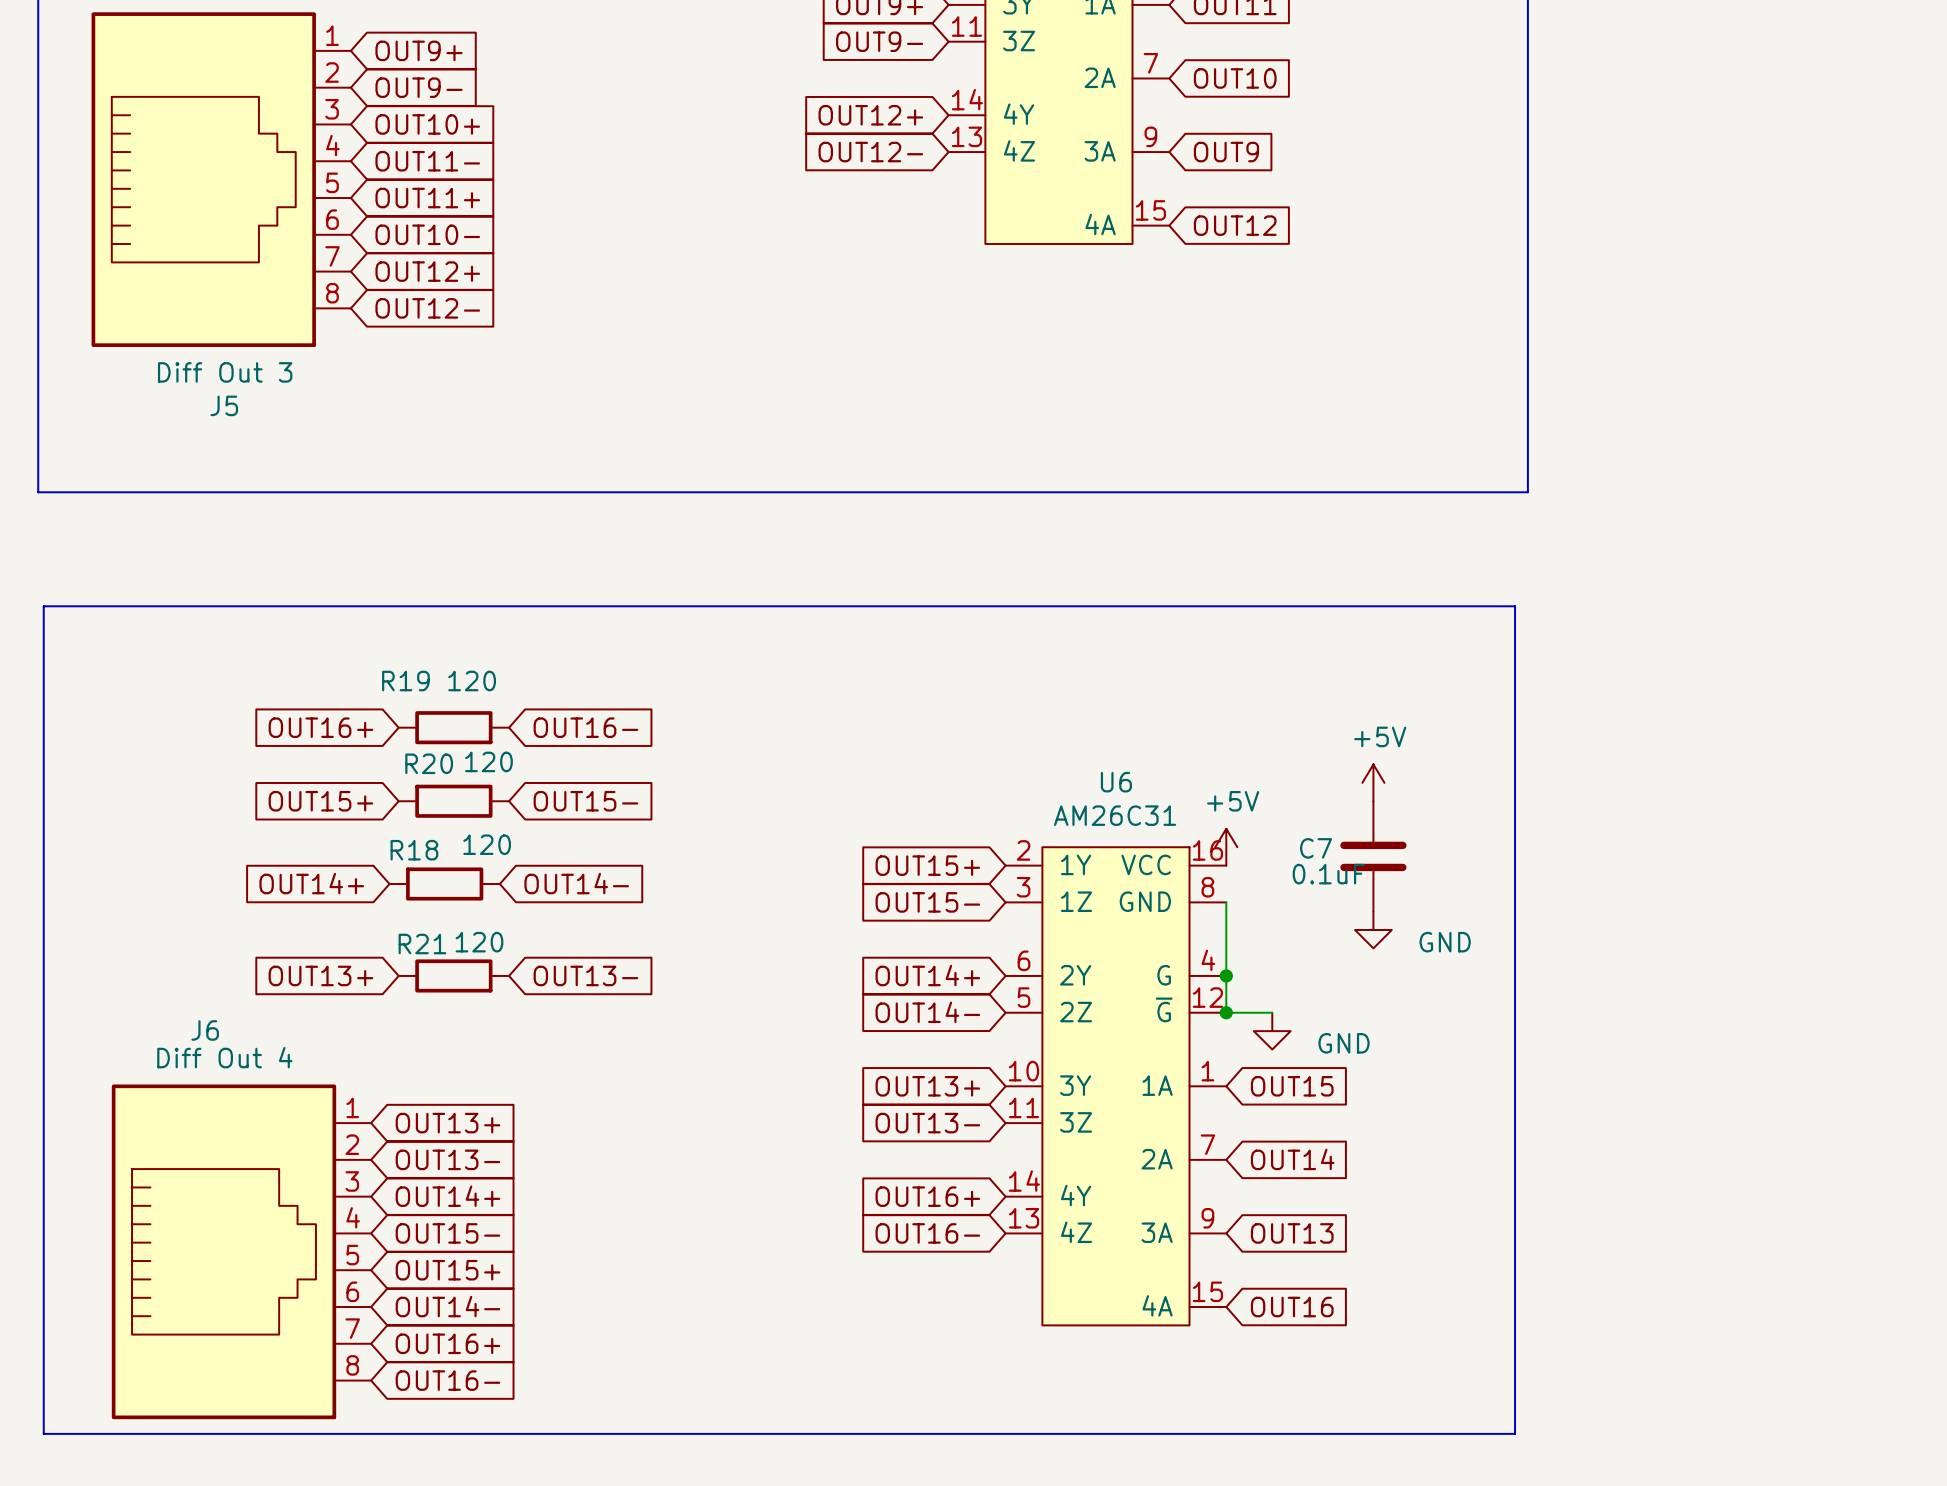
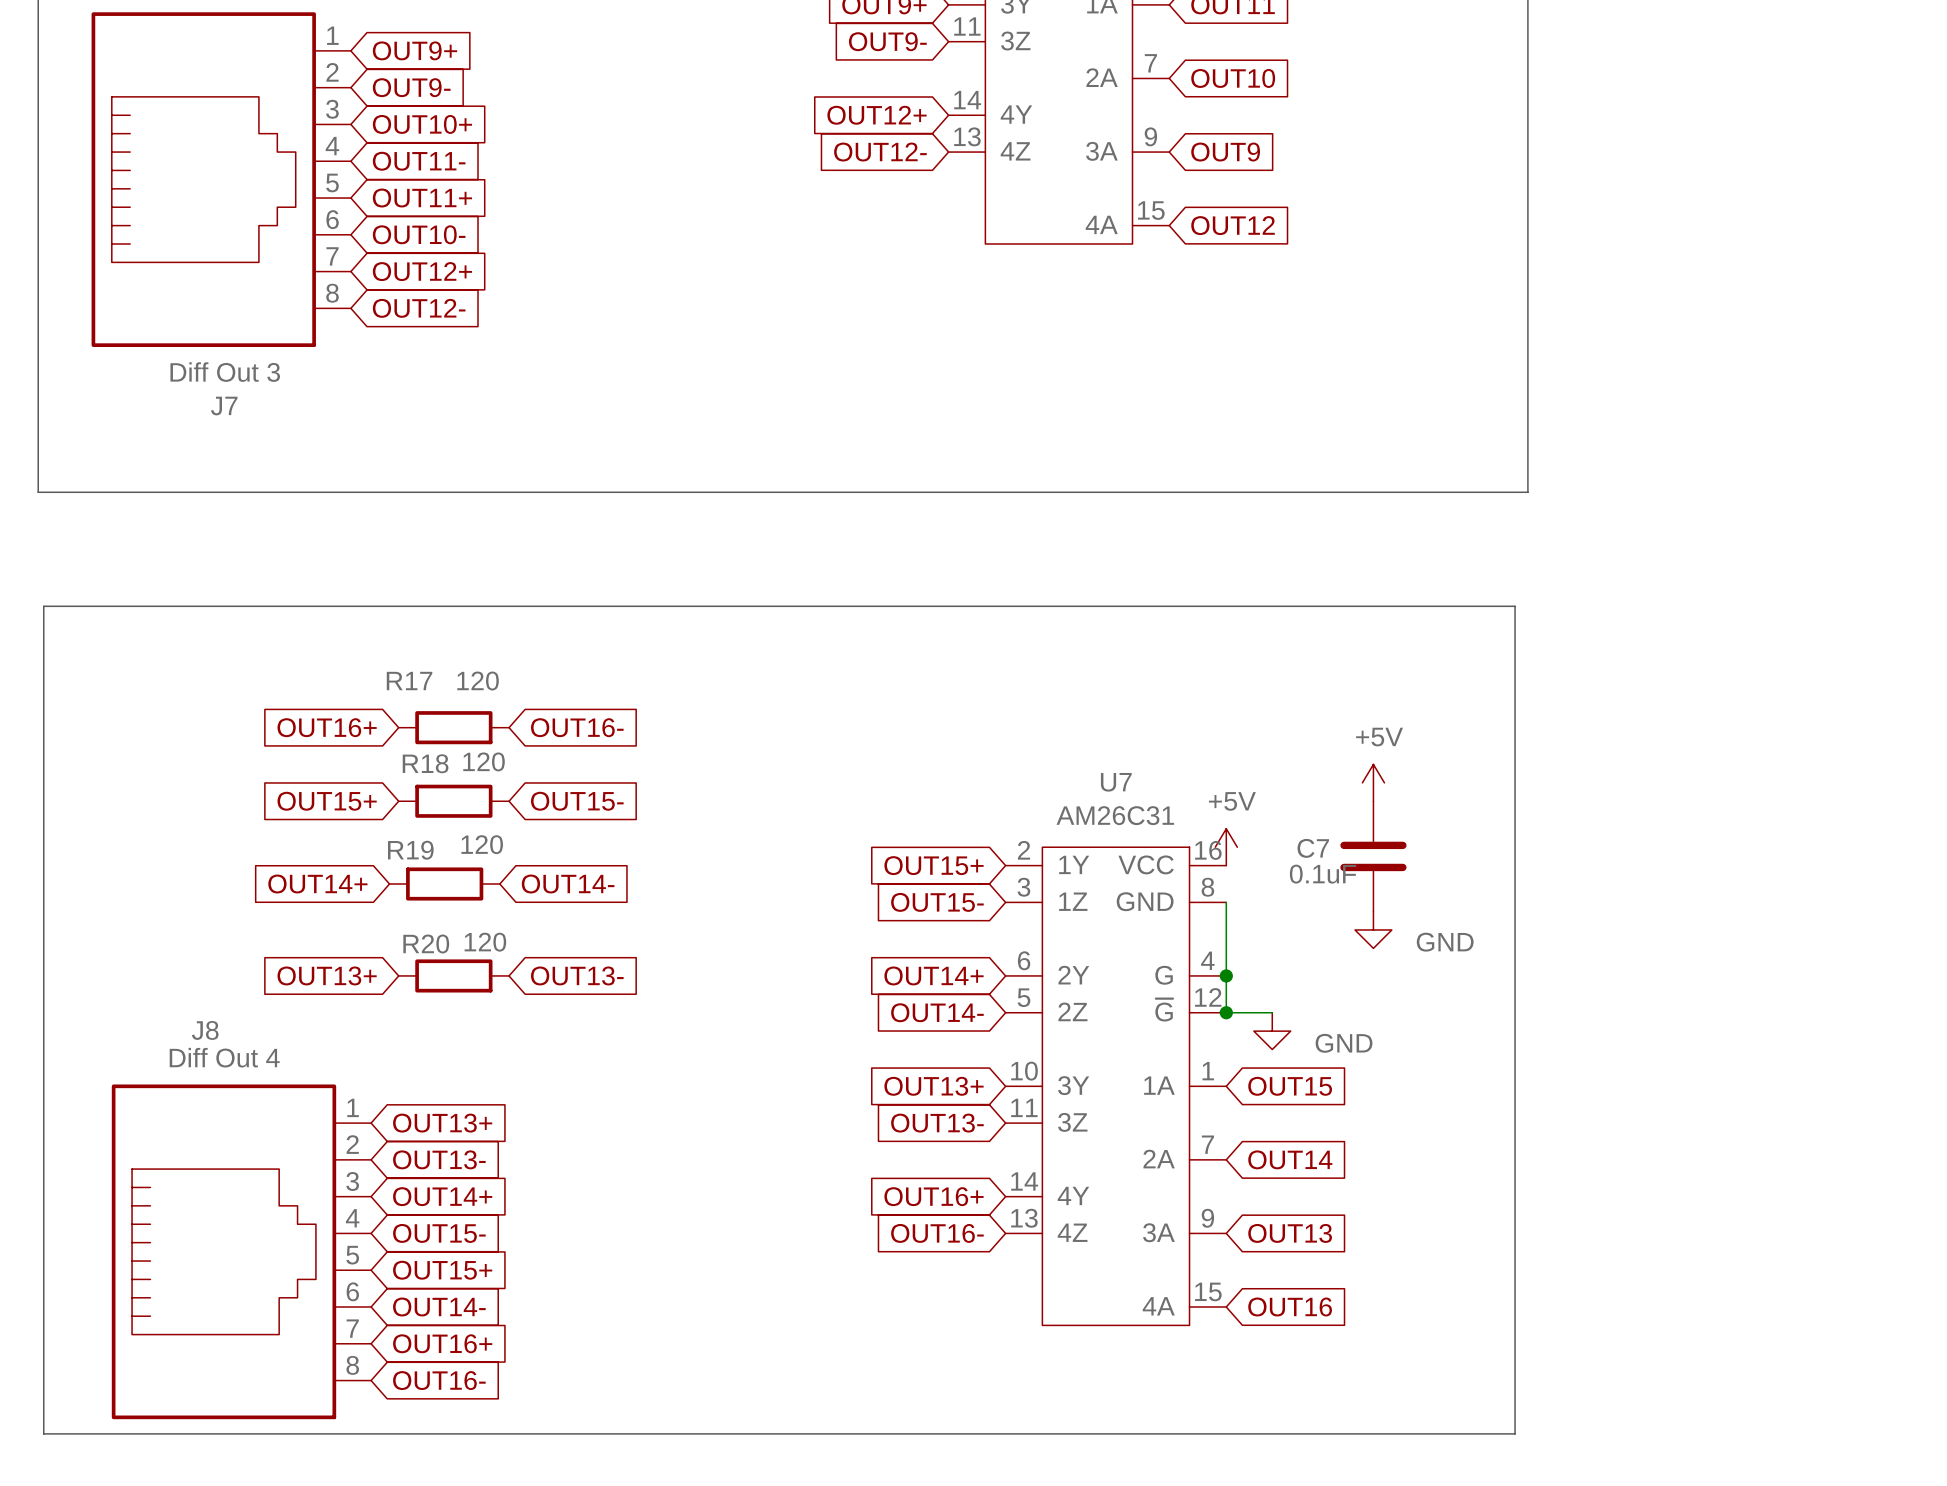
J5 name: J5 (224, 405) -> J7 (224, 406)
R19 name: R19 (405, 681) -> R17 (409, 681)
R20 name: R20 (429, 763) -> R18 (425, 763)
U6 name: U6 (1116, 782) -> U7 (1116, 782)
R18 name: R18 (414, 850) -> R19 (410, 850)
R21 name: R21 (422, 944) -> R20 (426, 944)
J6 name: J6 (205, 1030) -> J8 (205, 1030)

